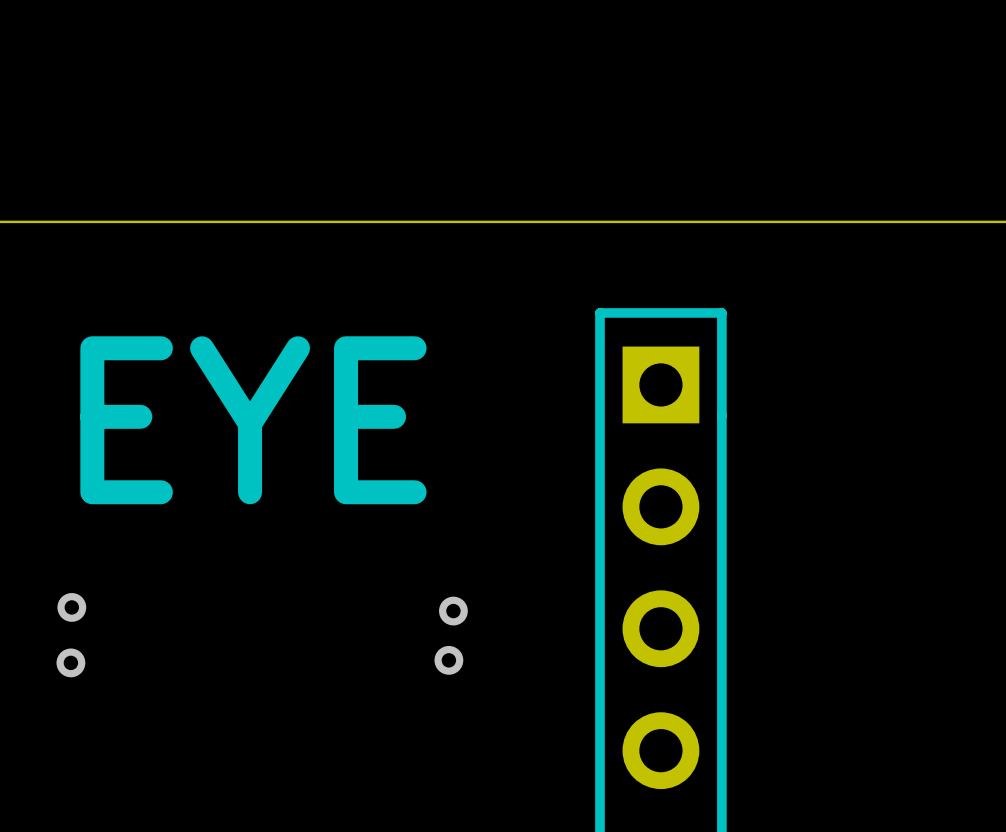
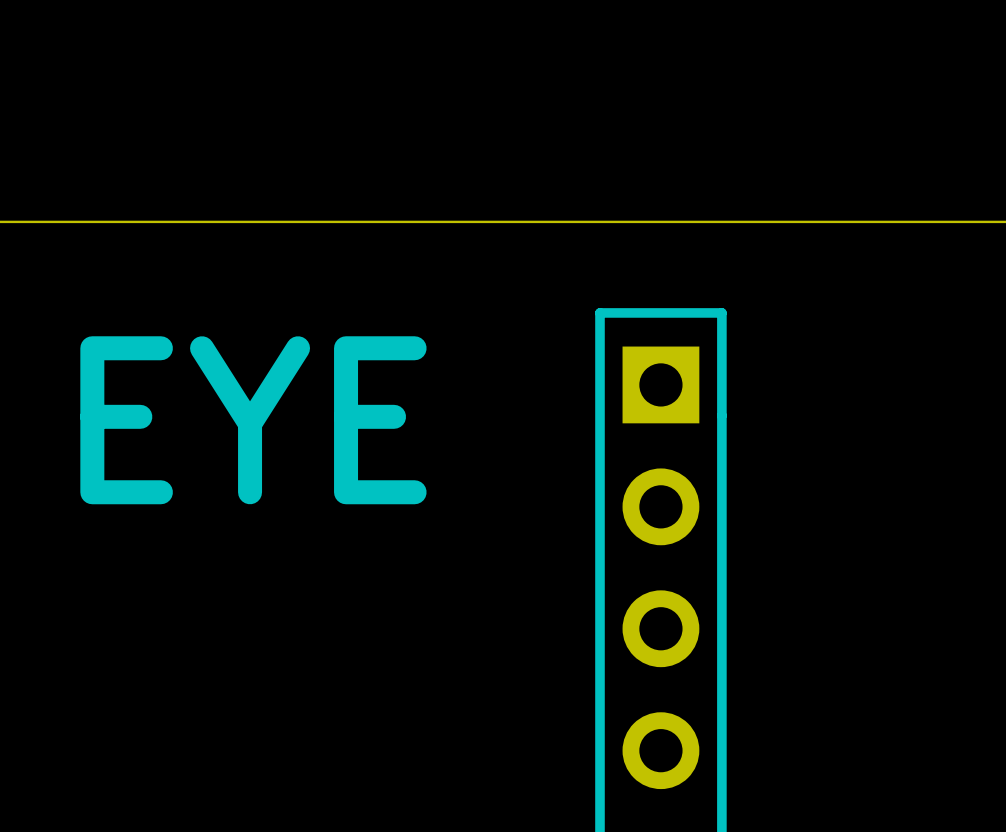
via: (71, 607) -> none
via: (453, 611) -> none
via: (448, 660) -> none
via: (70, 662) -> none

